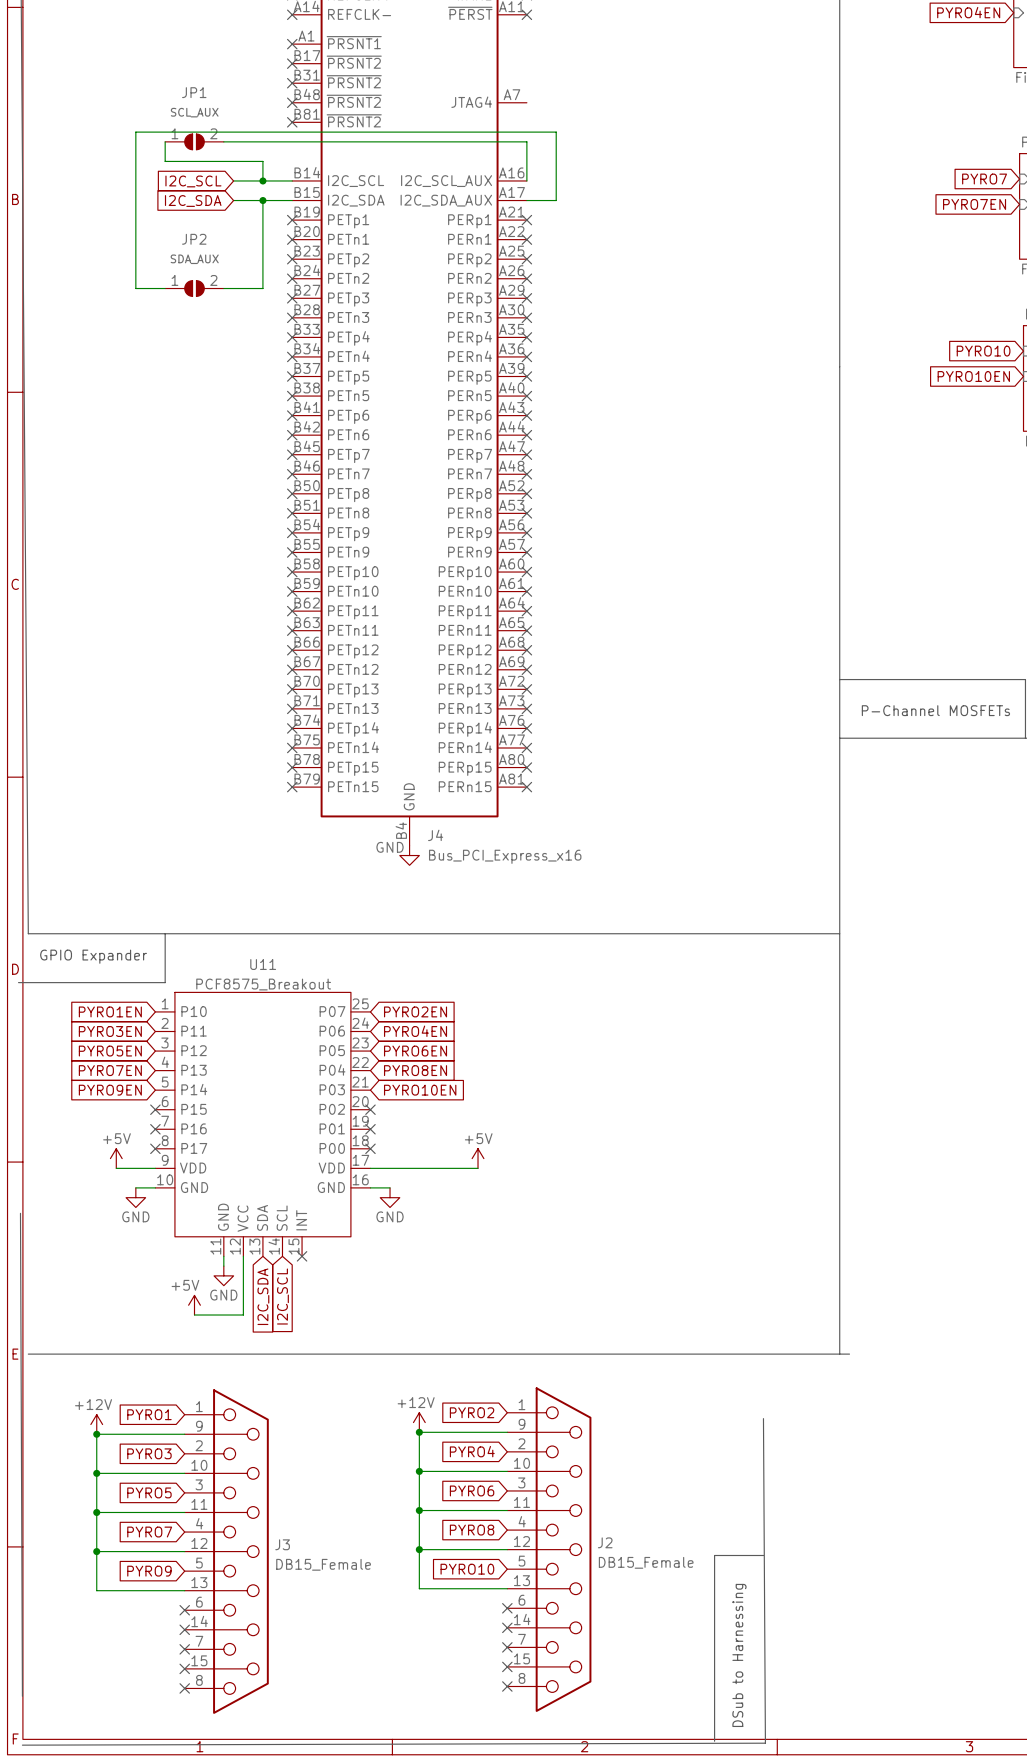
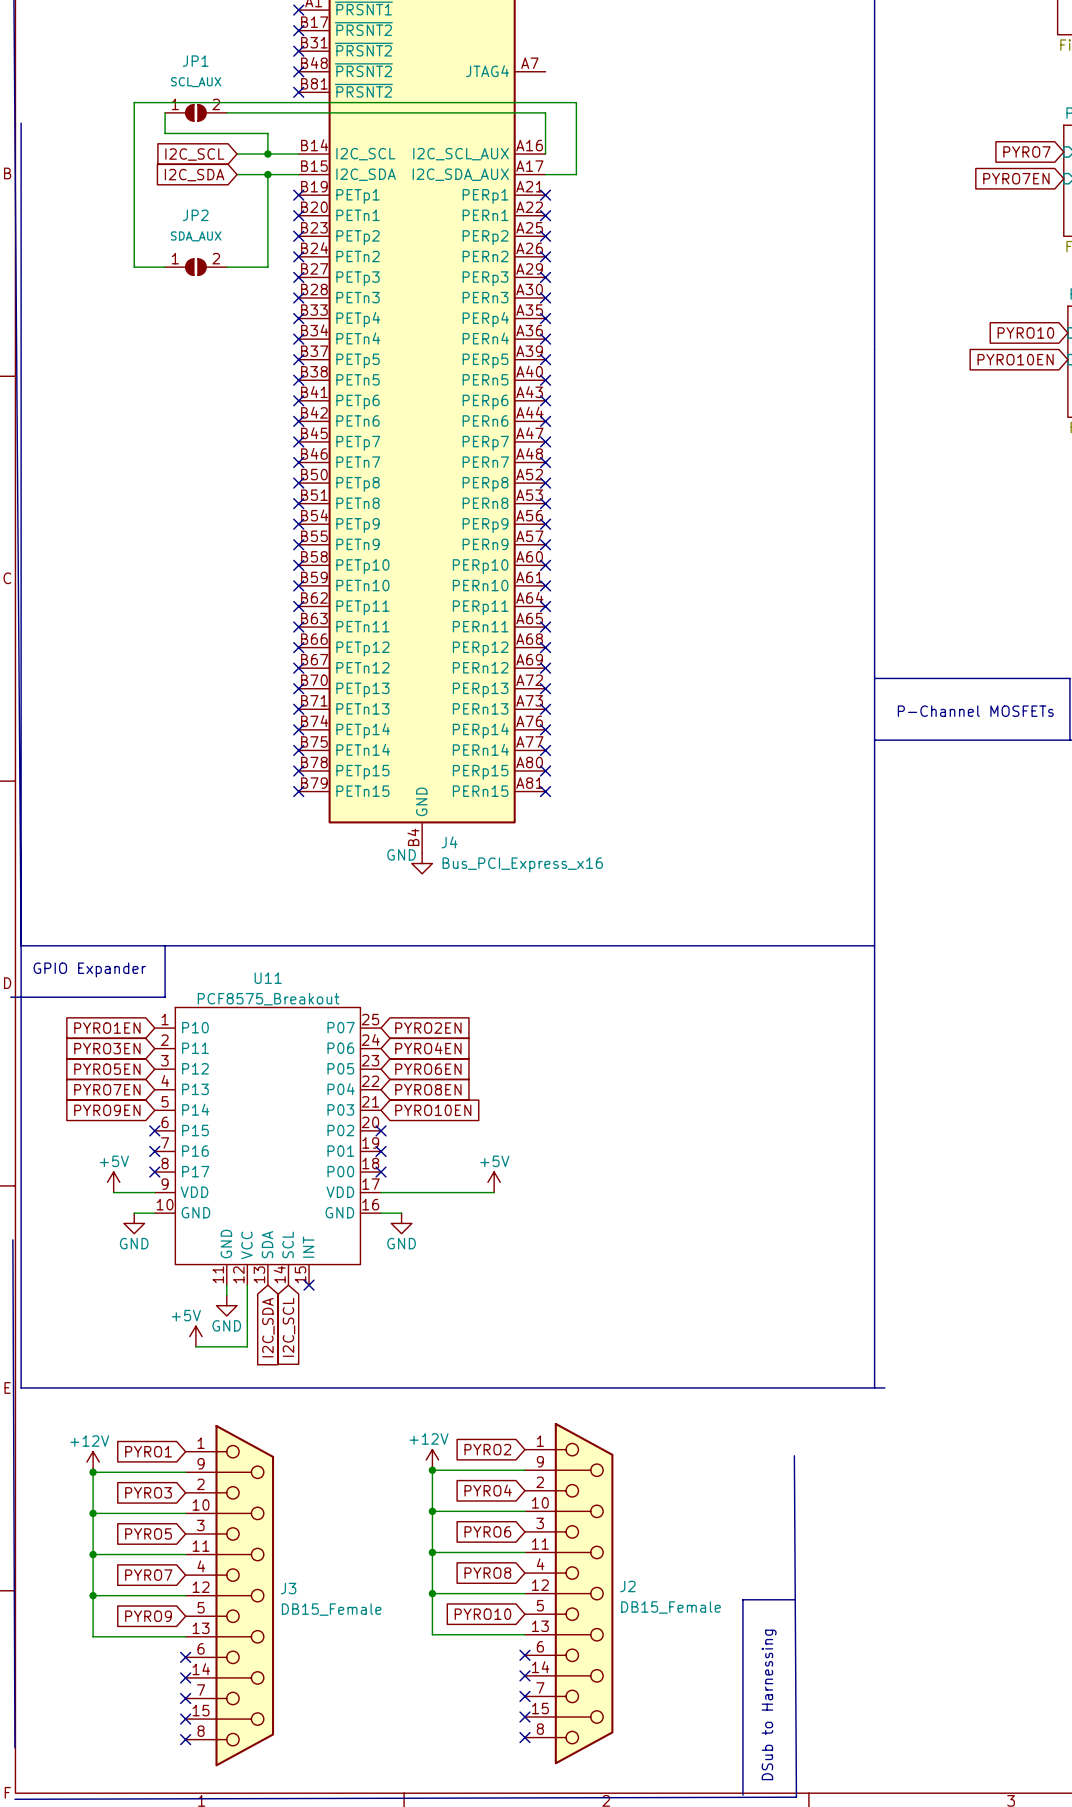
line: none -> (21, 123) (21, 1387)

